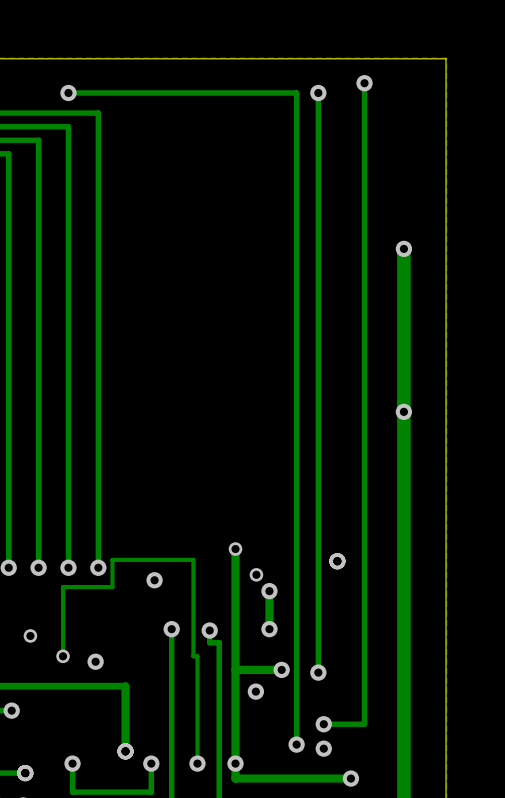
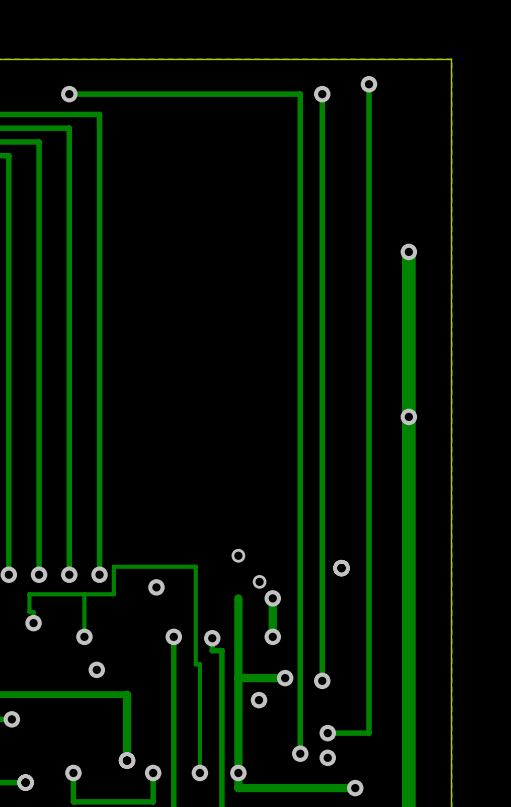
track: (235, 549) (235, 591) -> (84, 594) (84, 636)
track: (63, 587) (63, 656) -> (63, 594) (29, 594) (29, 612) (33, 612) (33, 623)
via: none -> (33, 623)
via: none -> (84, 636)
via: (30, 635) -> none
via: (63, 656) -> none

